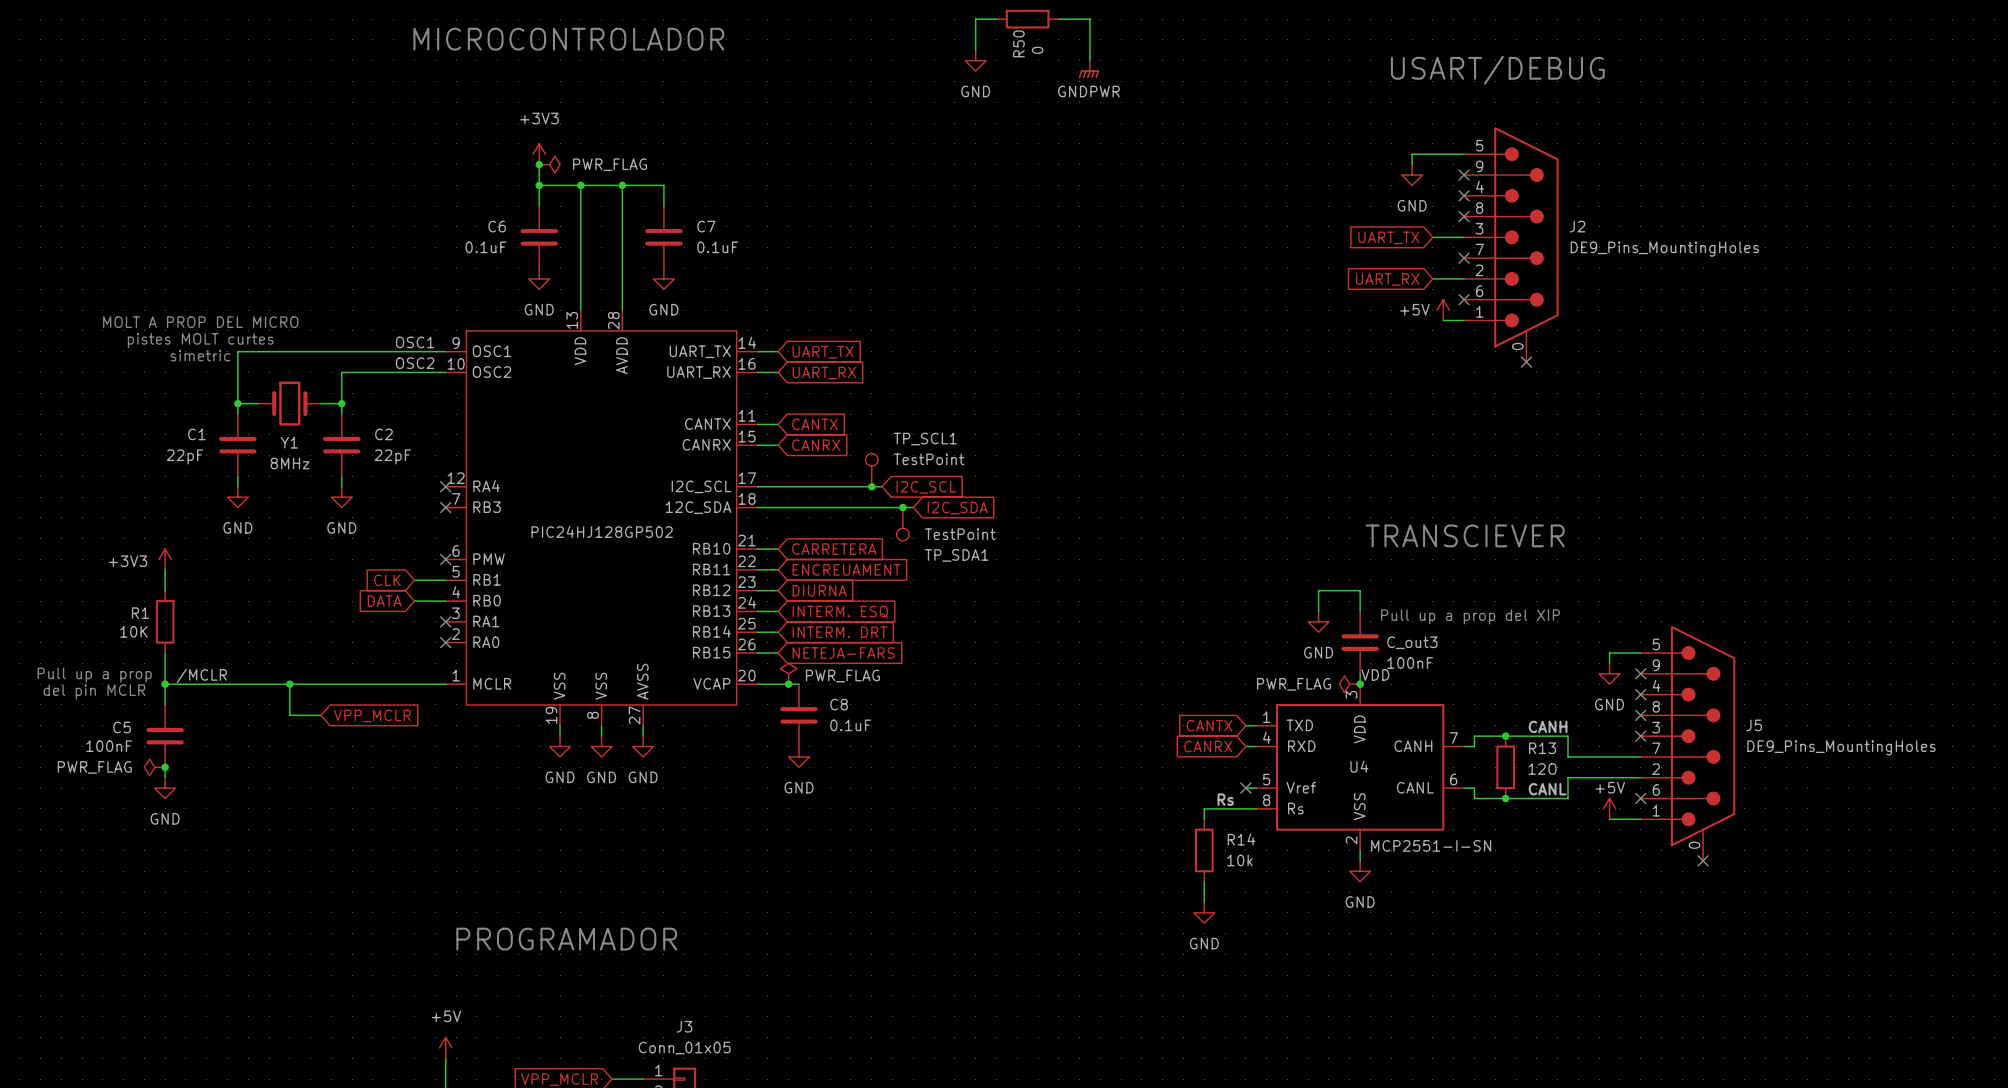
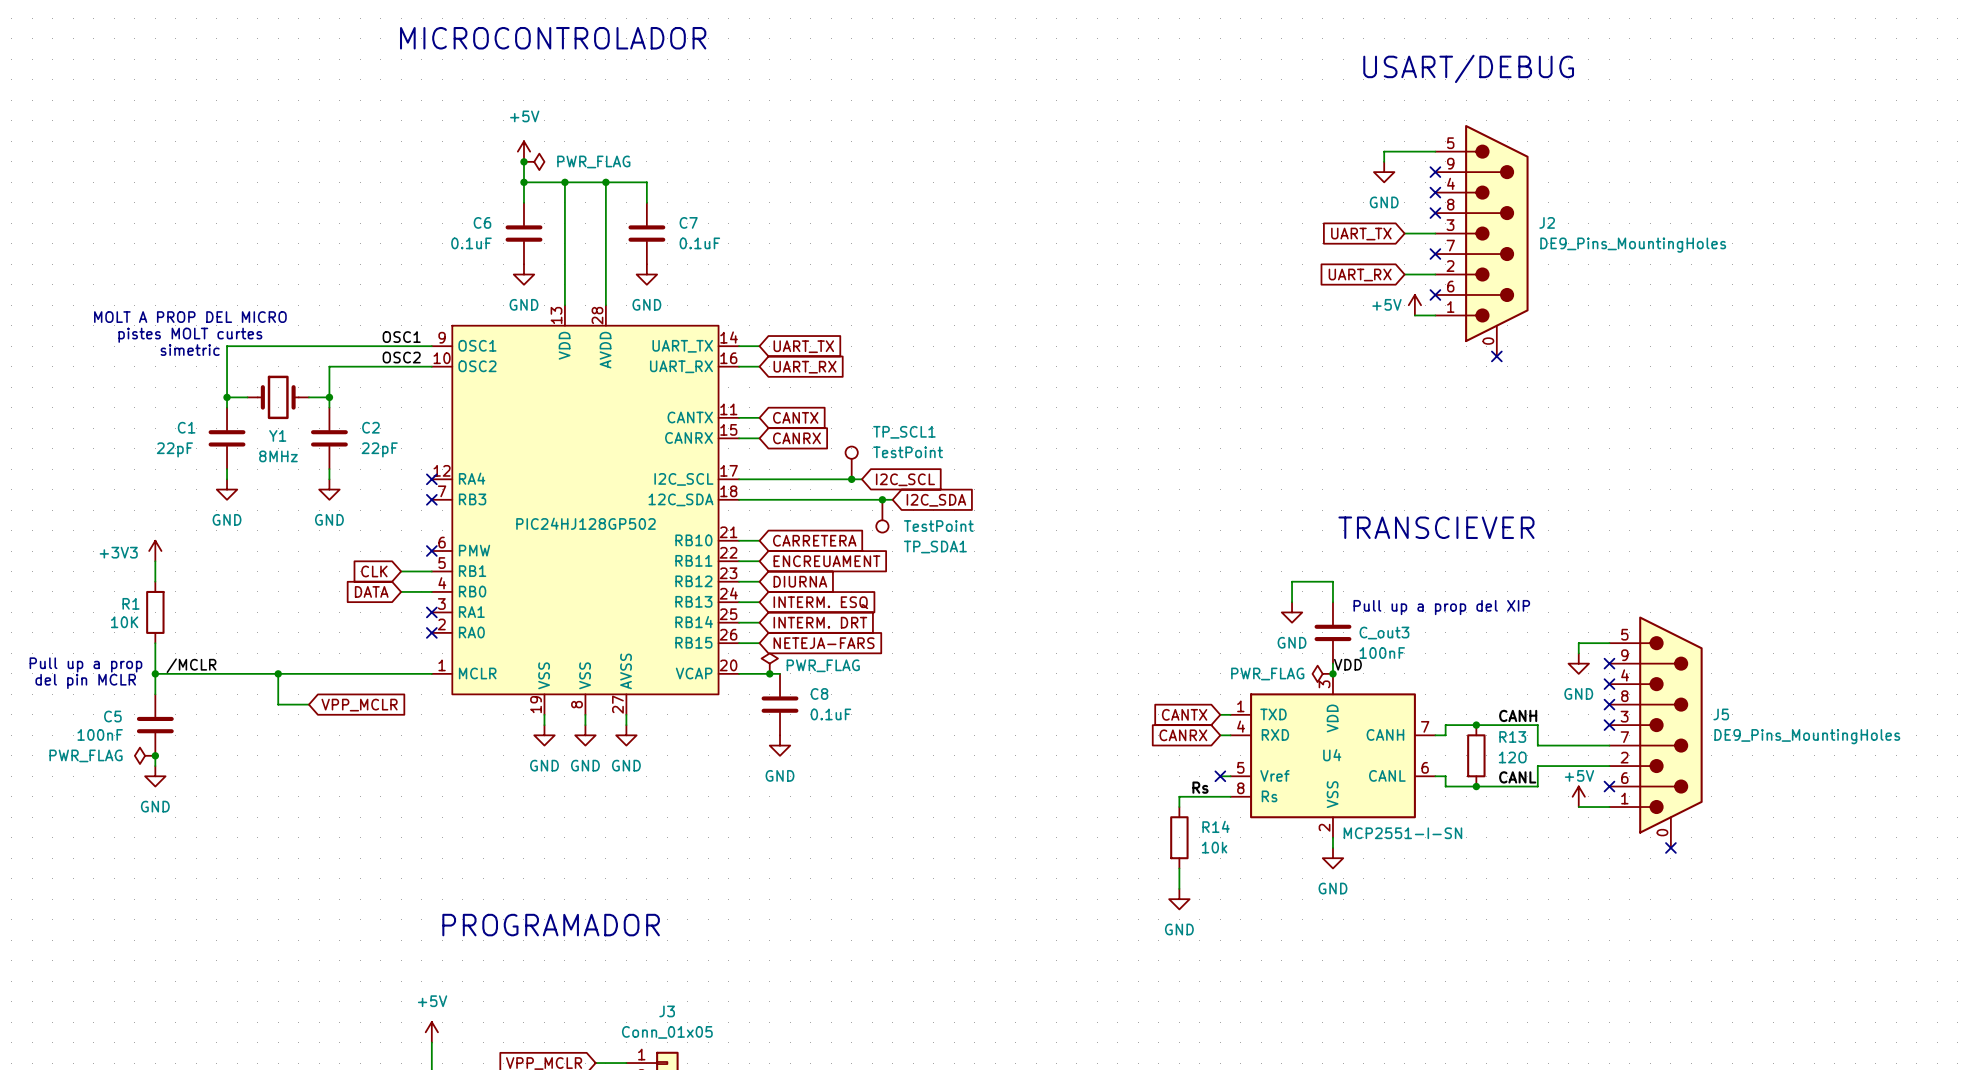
wire: (996, 19) (975, 19) (975, 50) -> none
R50: 0 (1027, 19) -> none
wire: (1058, 19) (1089, 19) (1089, 60) -> none
power symbol: GND (975, 60) -> none
power symbol: GNDPWR (1088, 69) -> none
power symbol: +3V3 (539, 154) -> +5V (523, 151)

